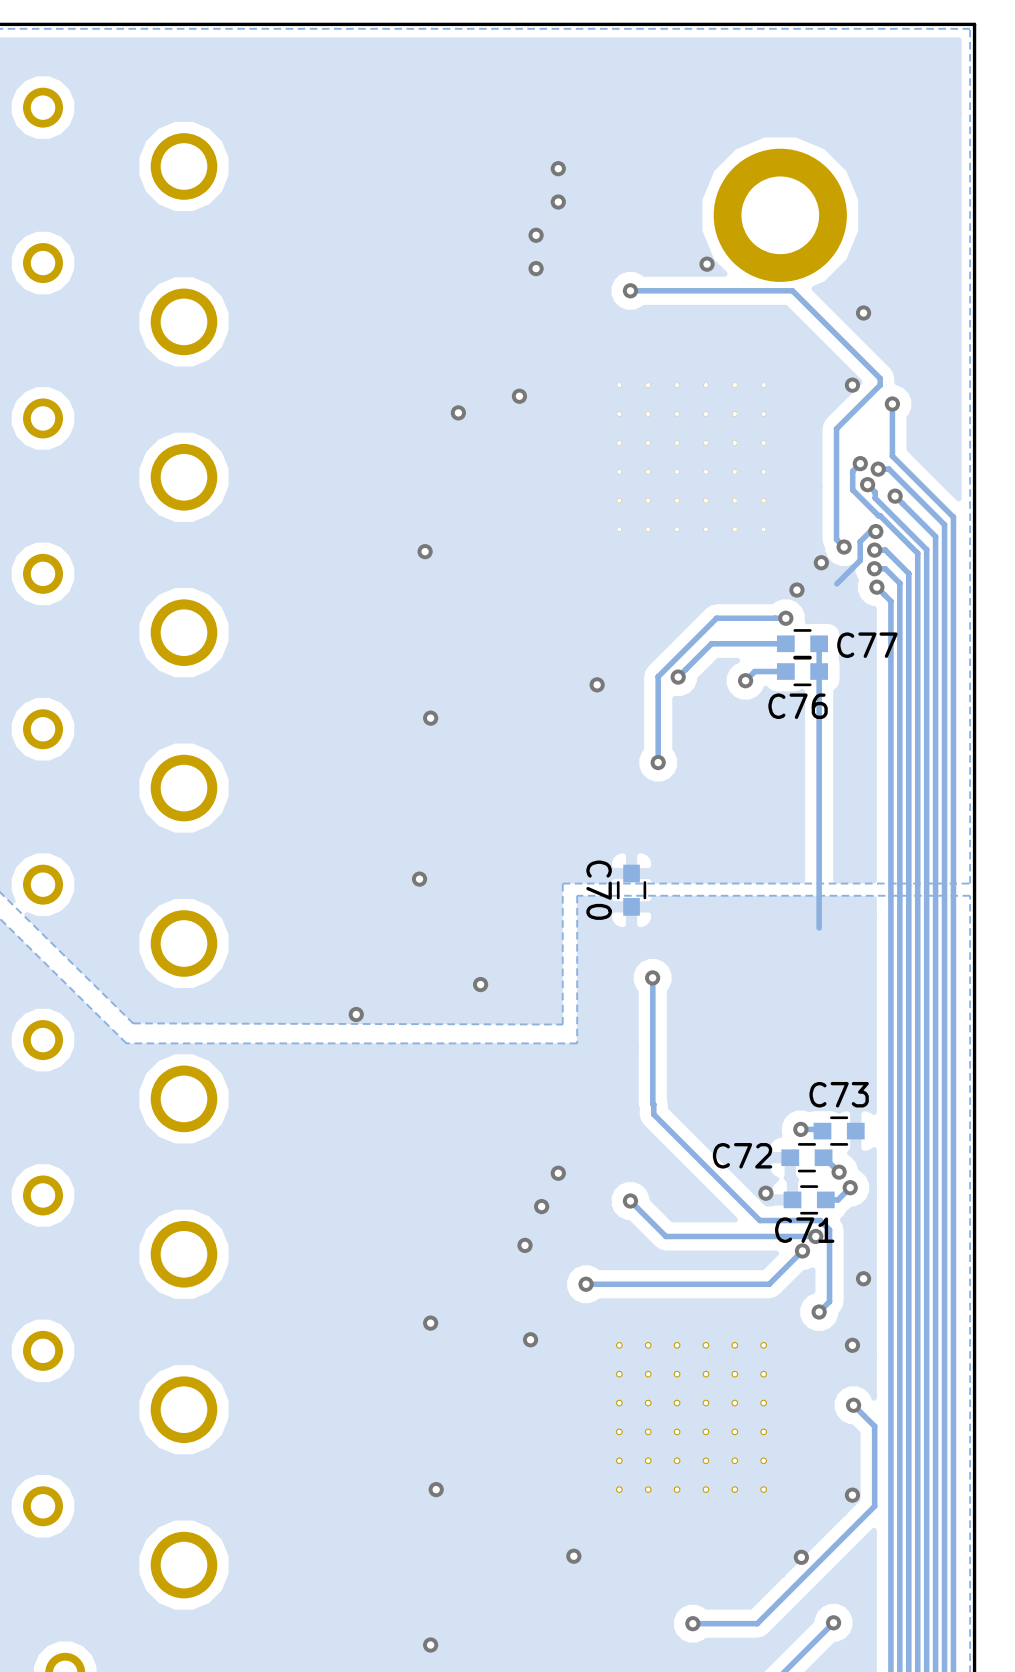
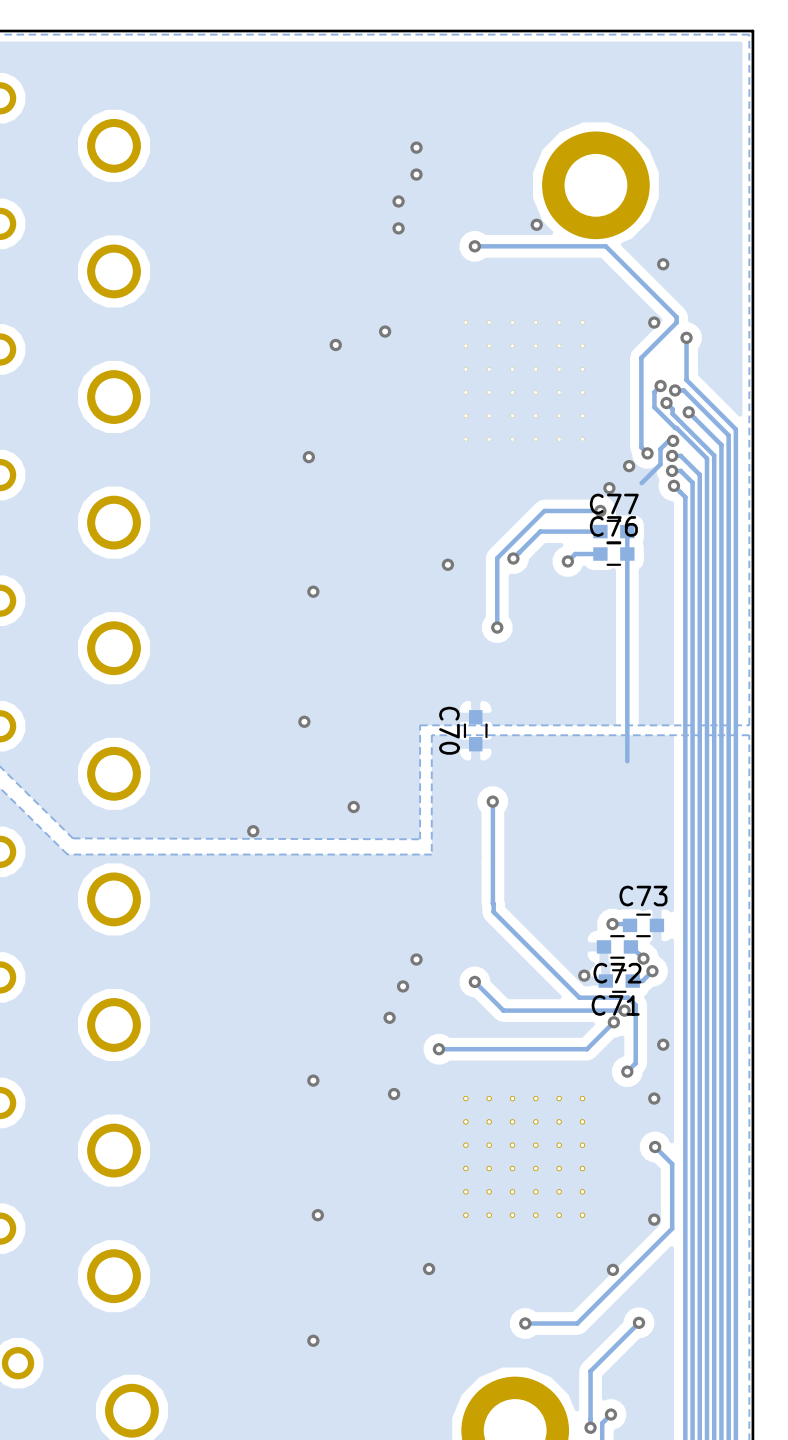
C77 name position: C77 (867, 645) -> C77 (614, 504)
C76 name position: C76 (798, 706) -> C76 (613, 526)
C72 name position: C72 (742, 1155) -> C72 (617, 973)

